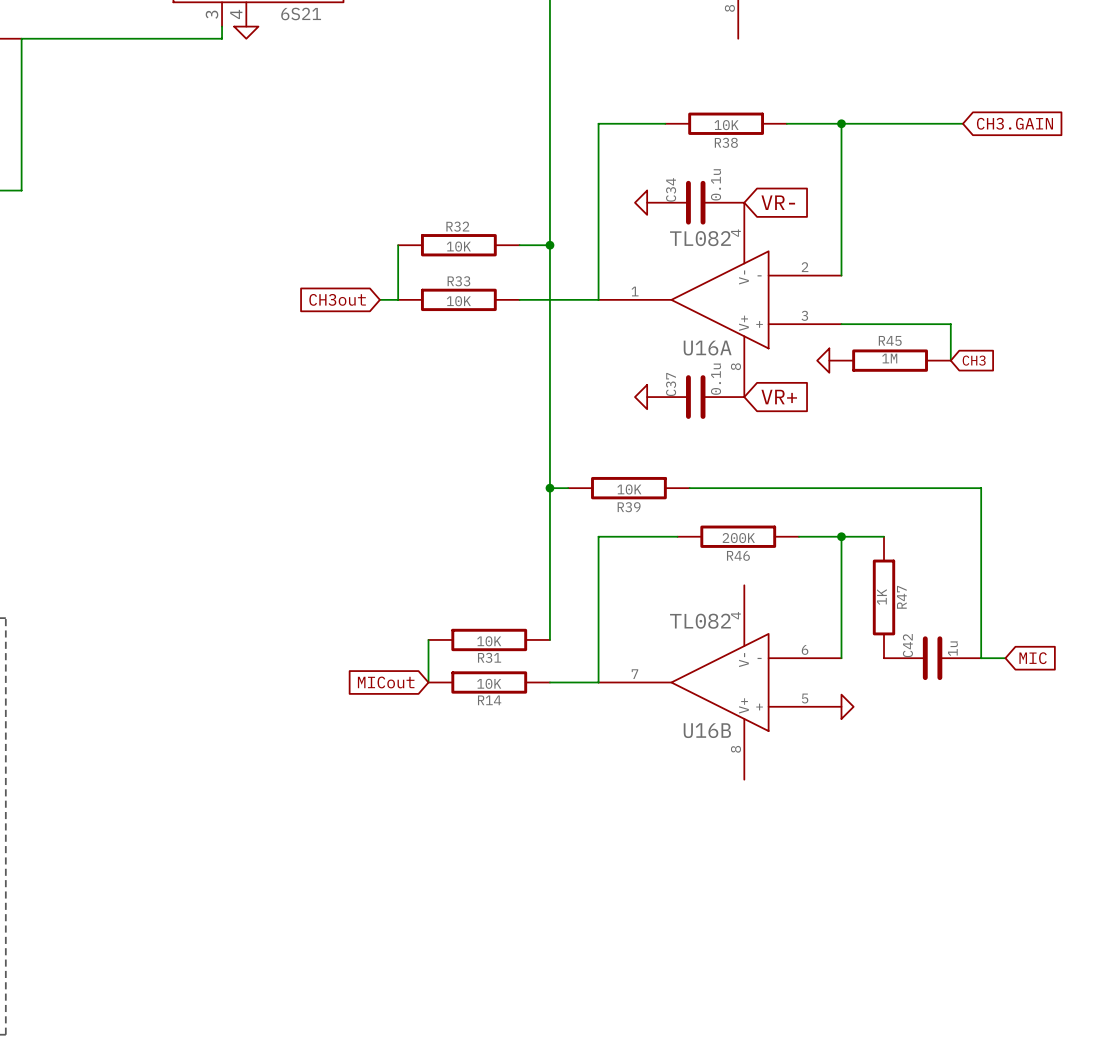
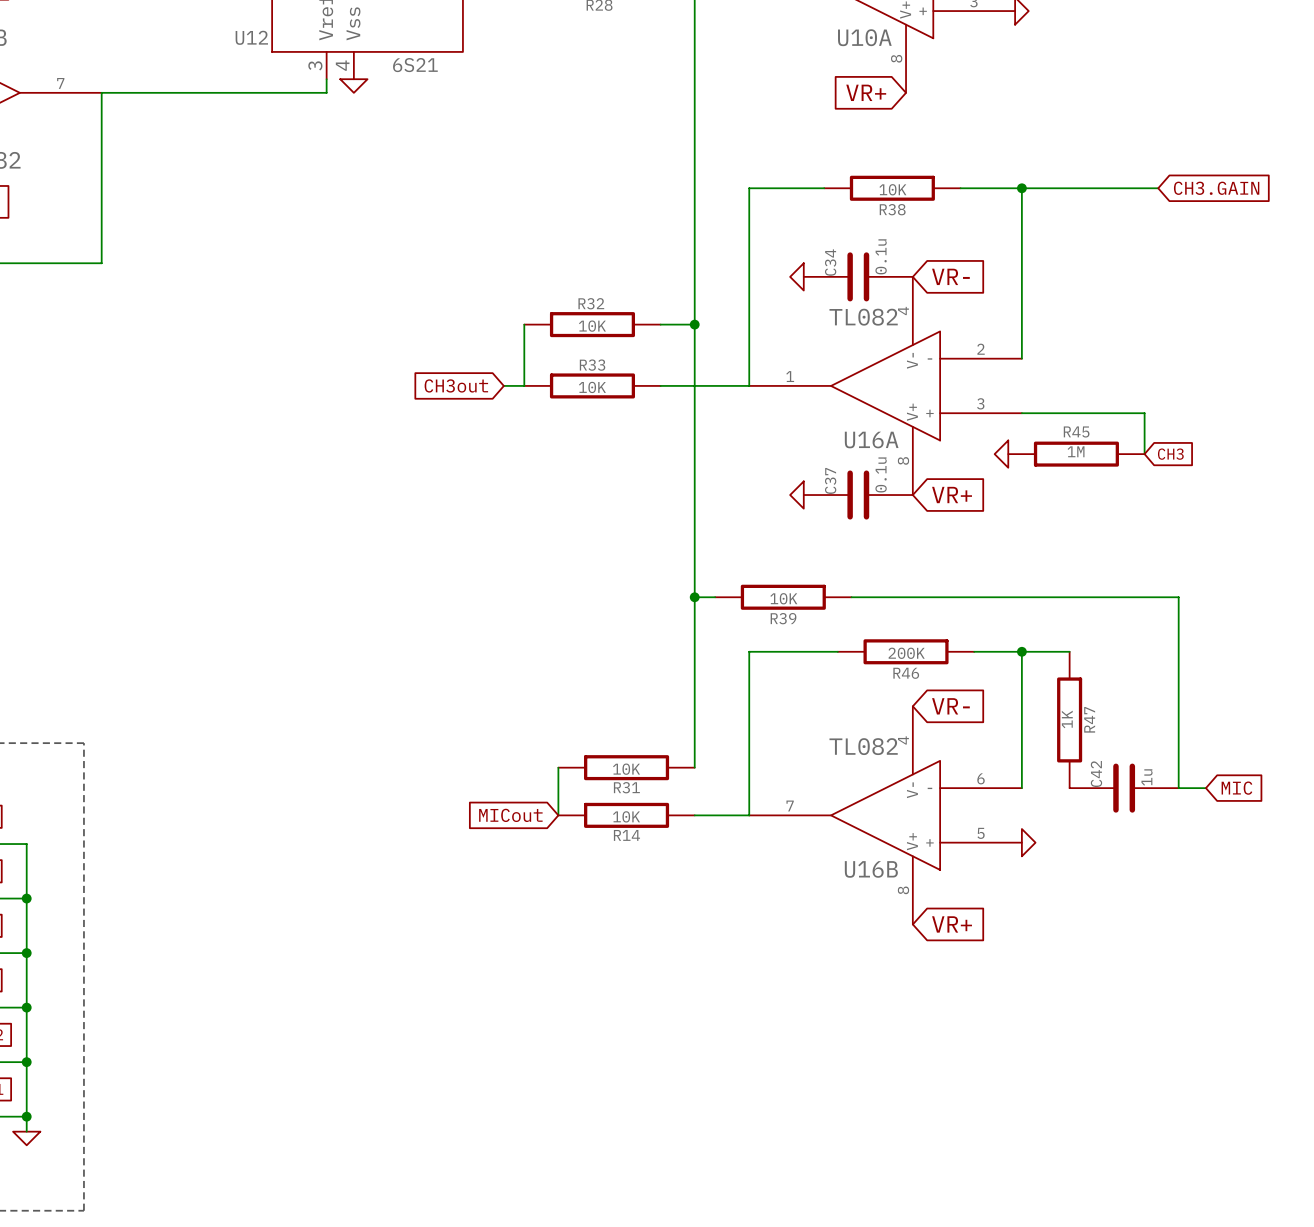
global label: none -> VR+ (866, 92)
global label: none -> VR- (950, 706)
global label: none -> VR+ (952, 924)

